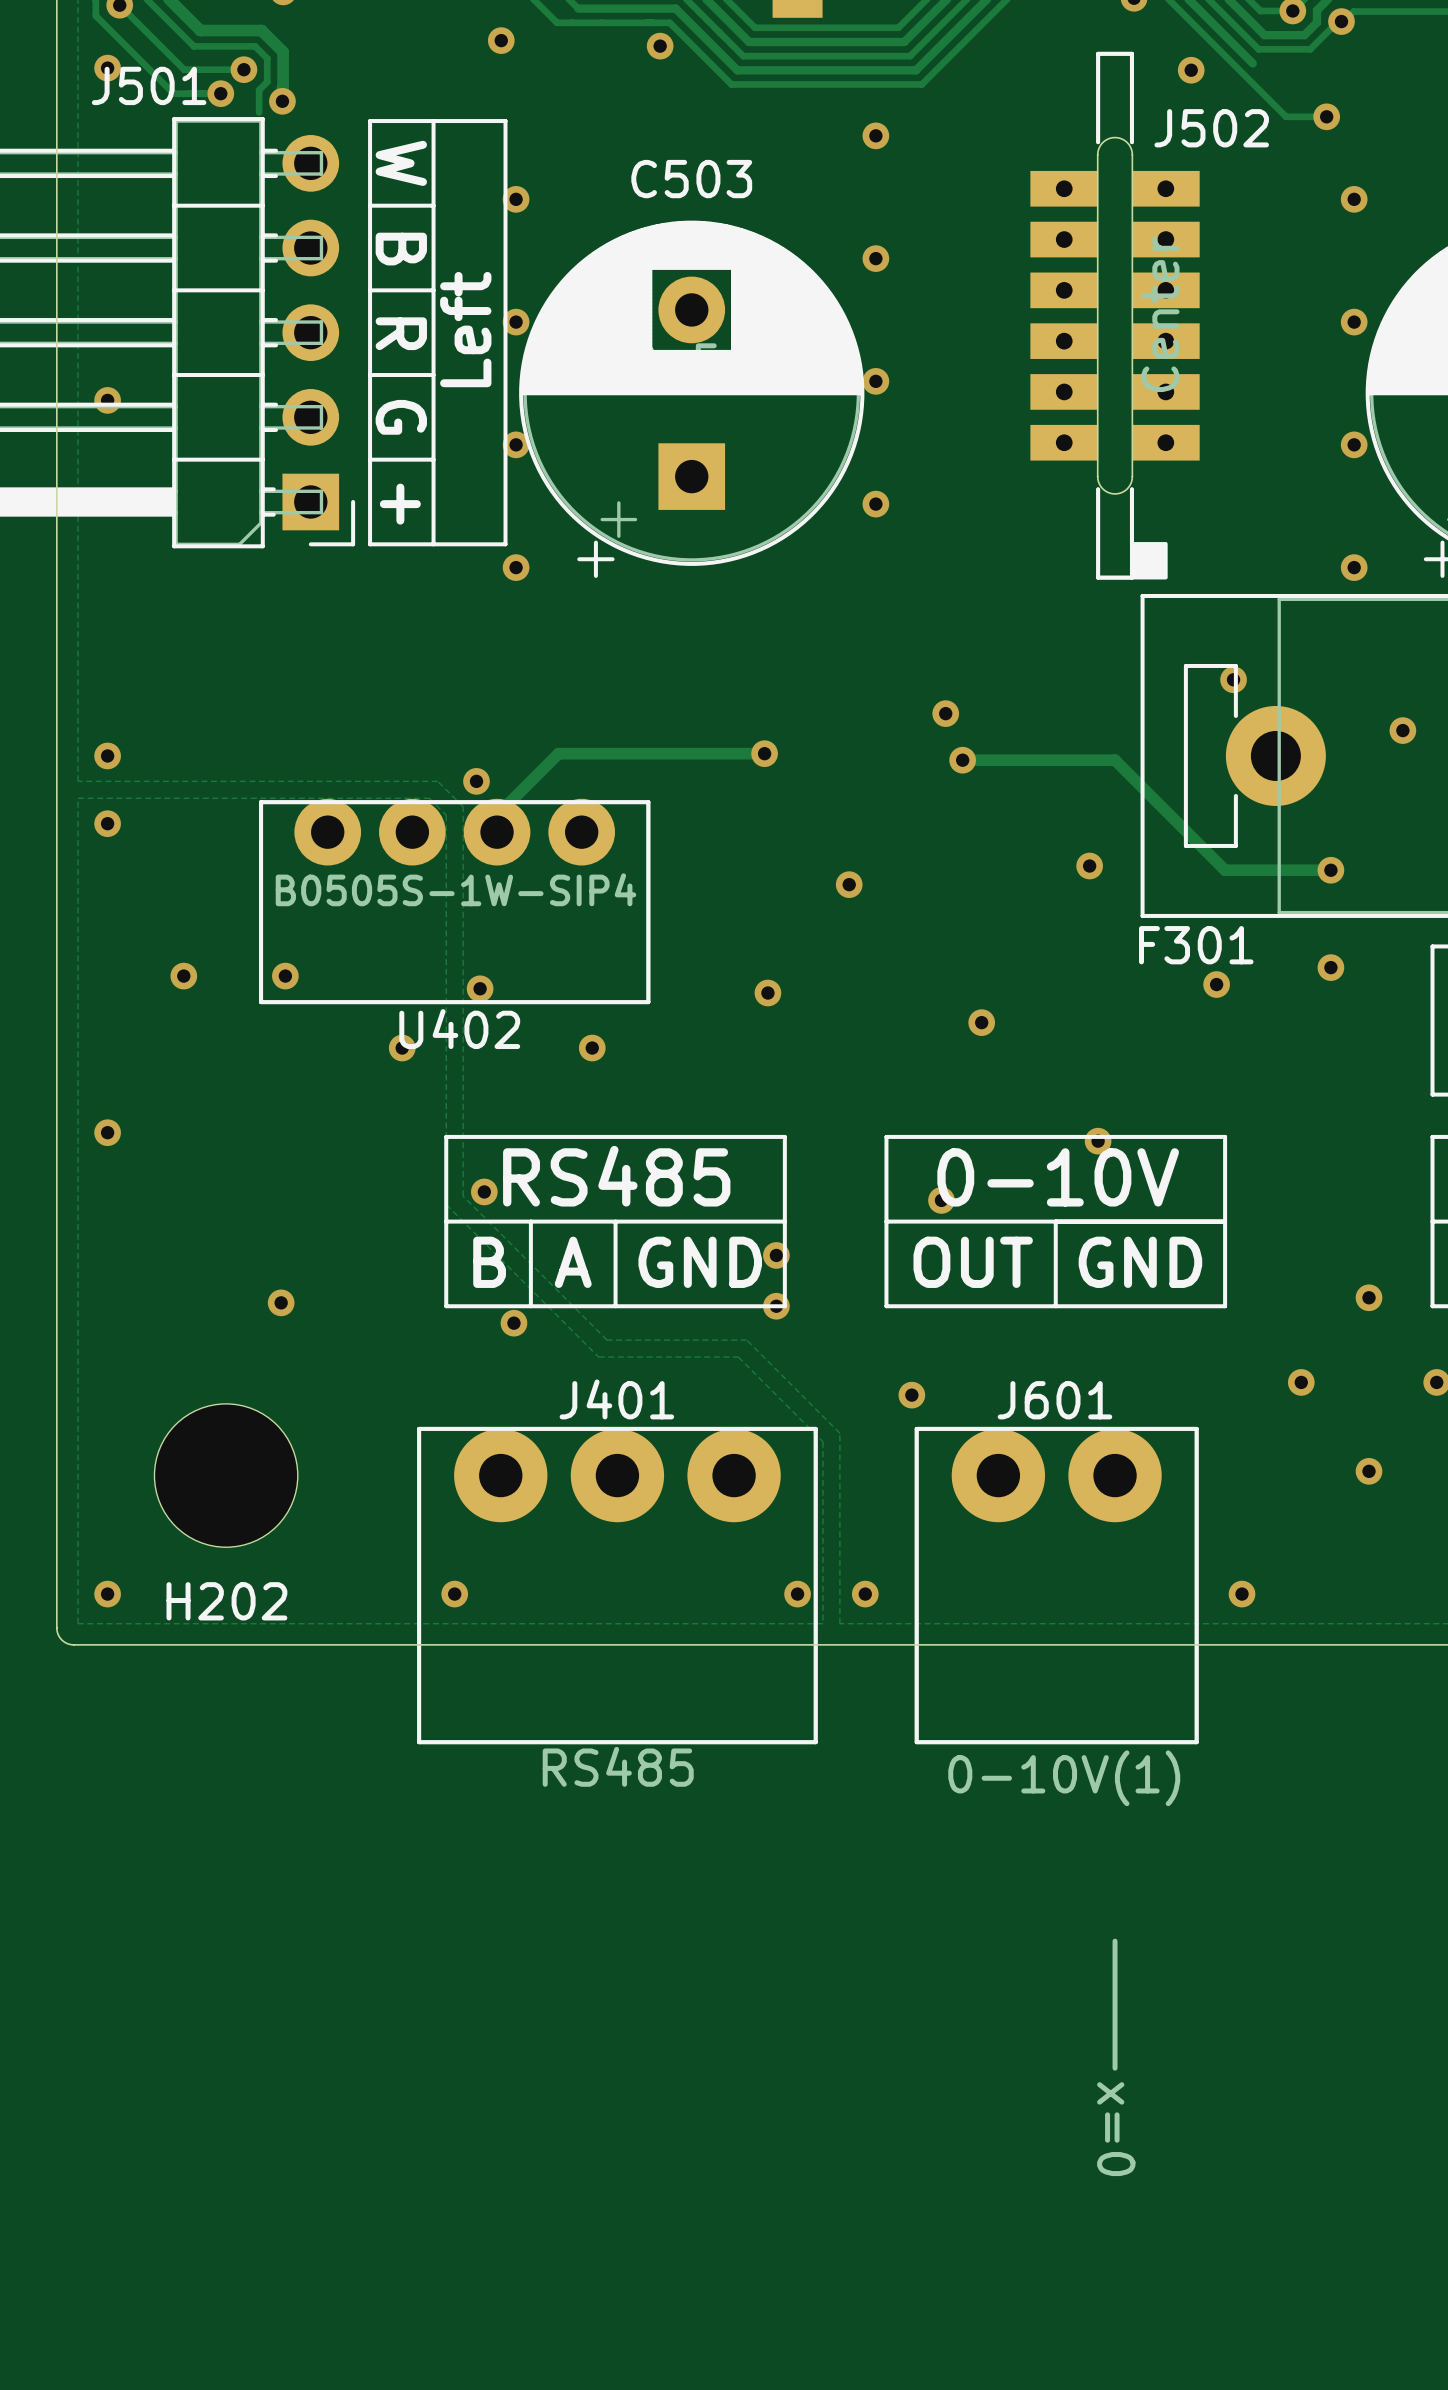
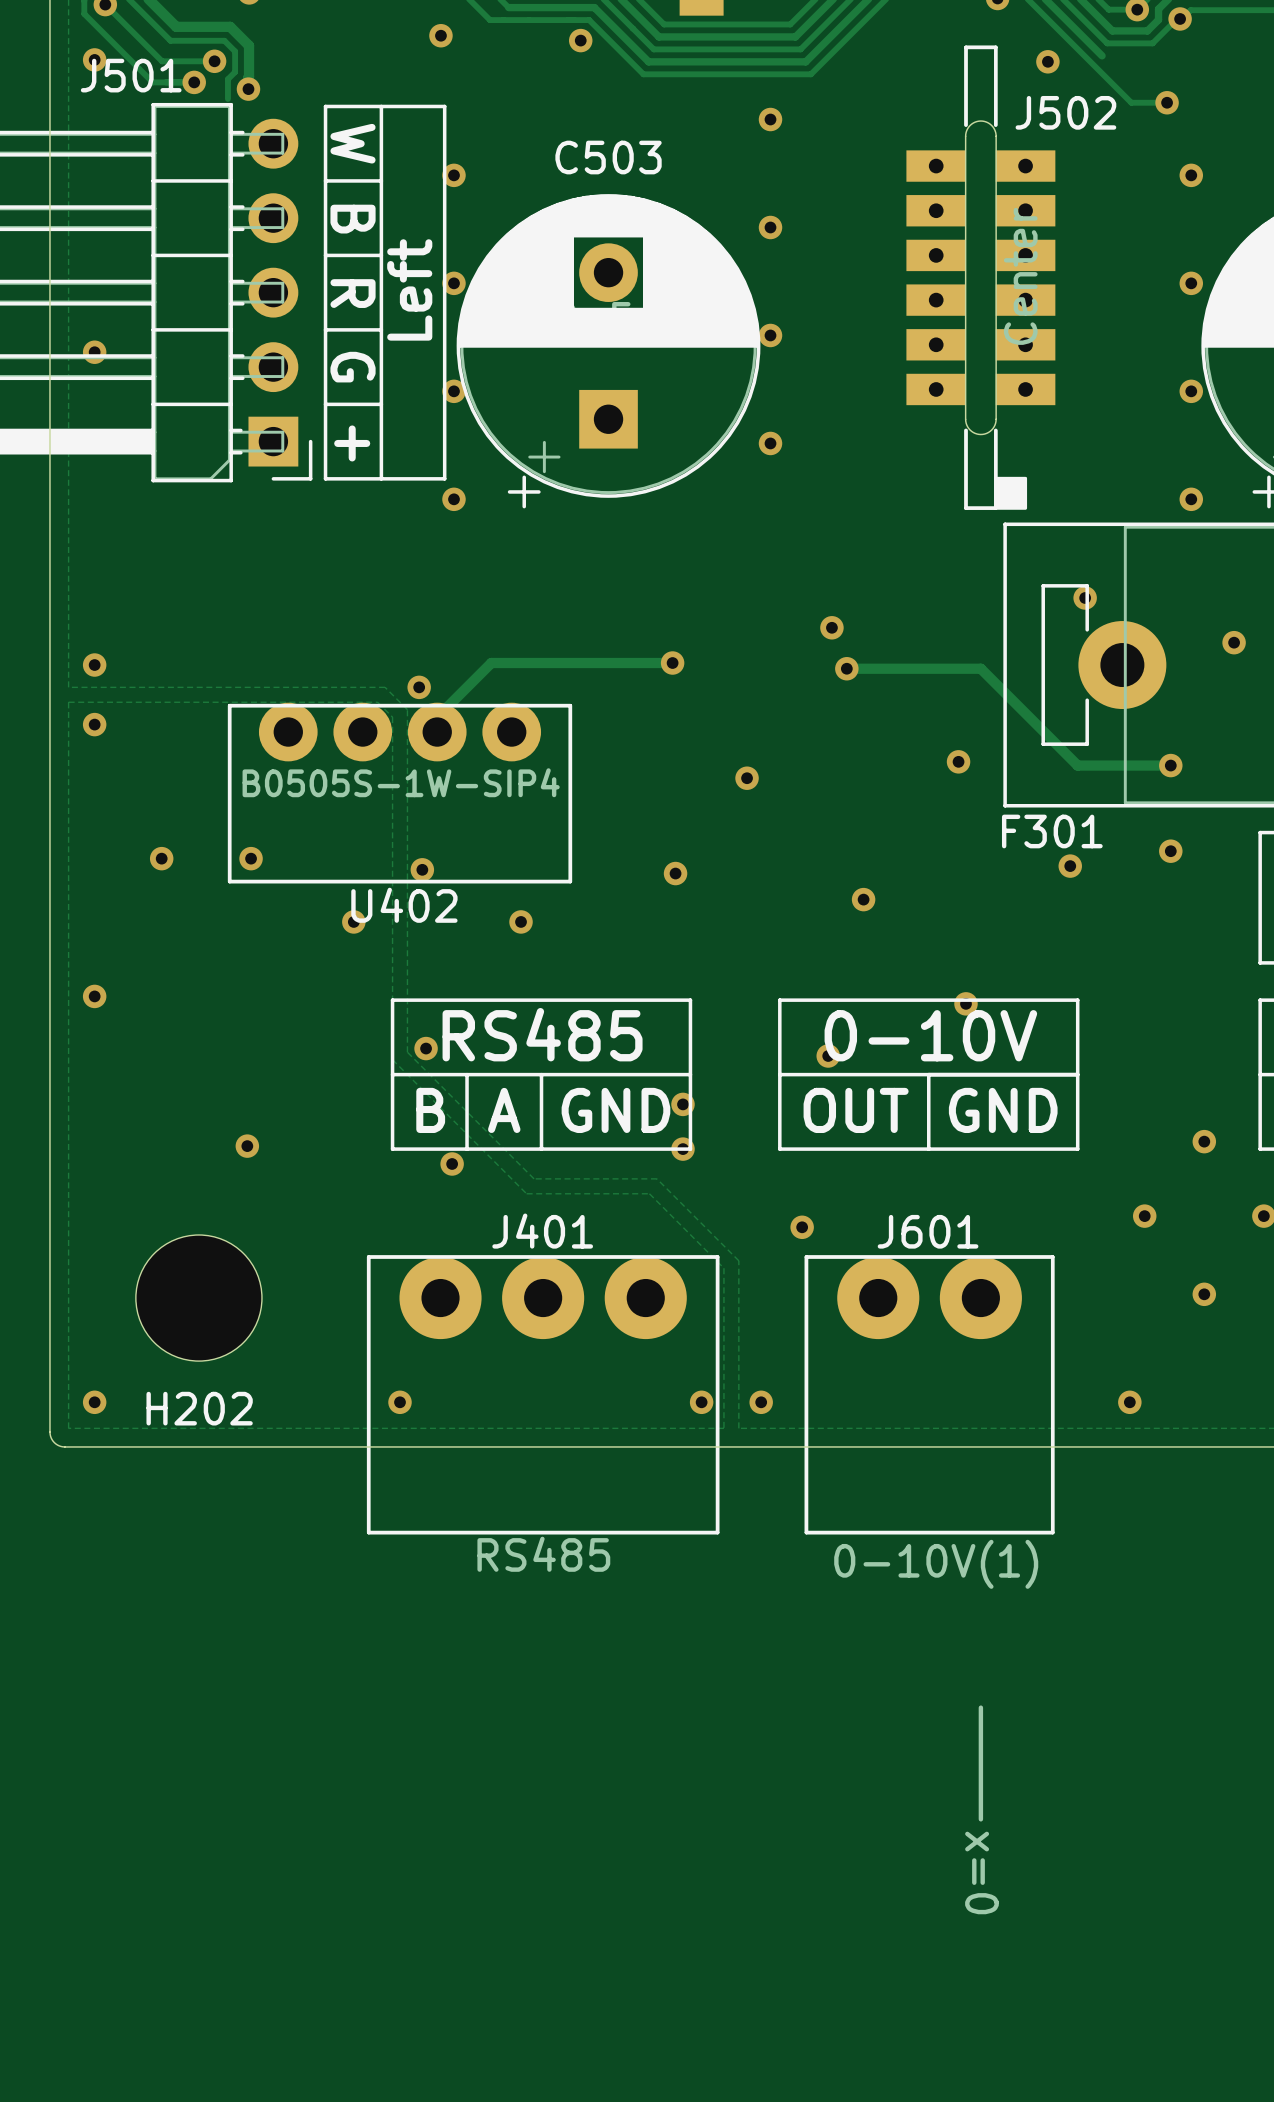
via position: (1242, 1594) -> (1129, 1402)

